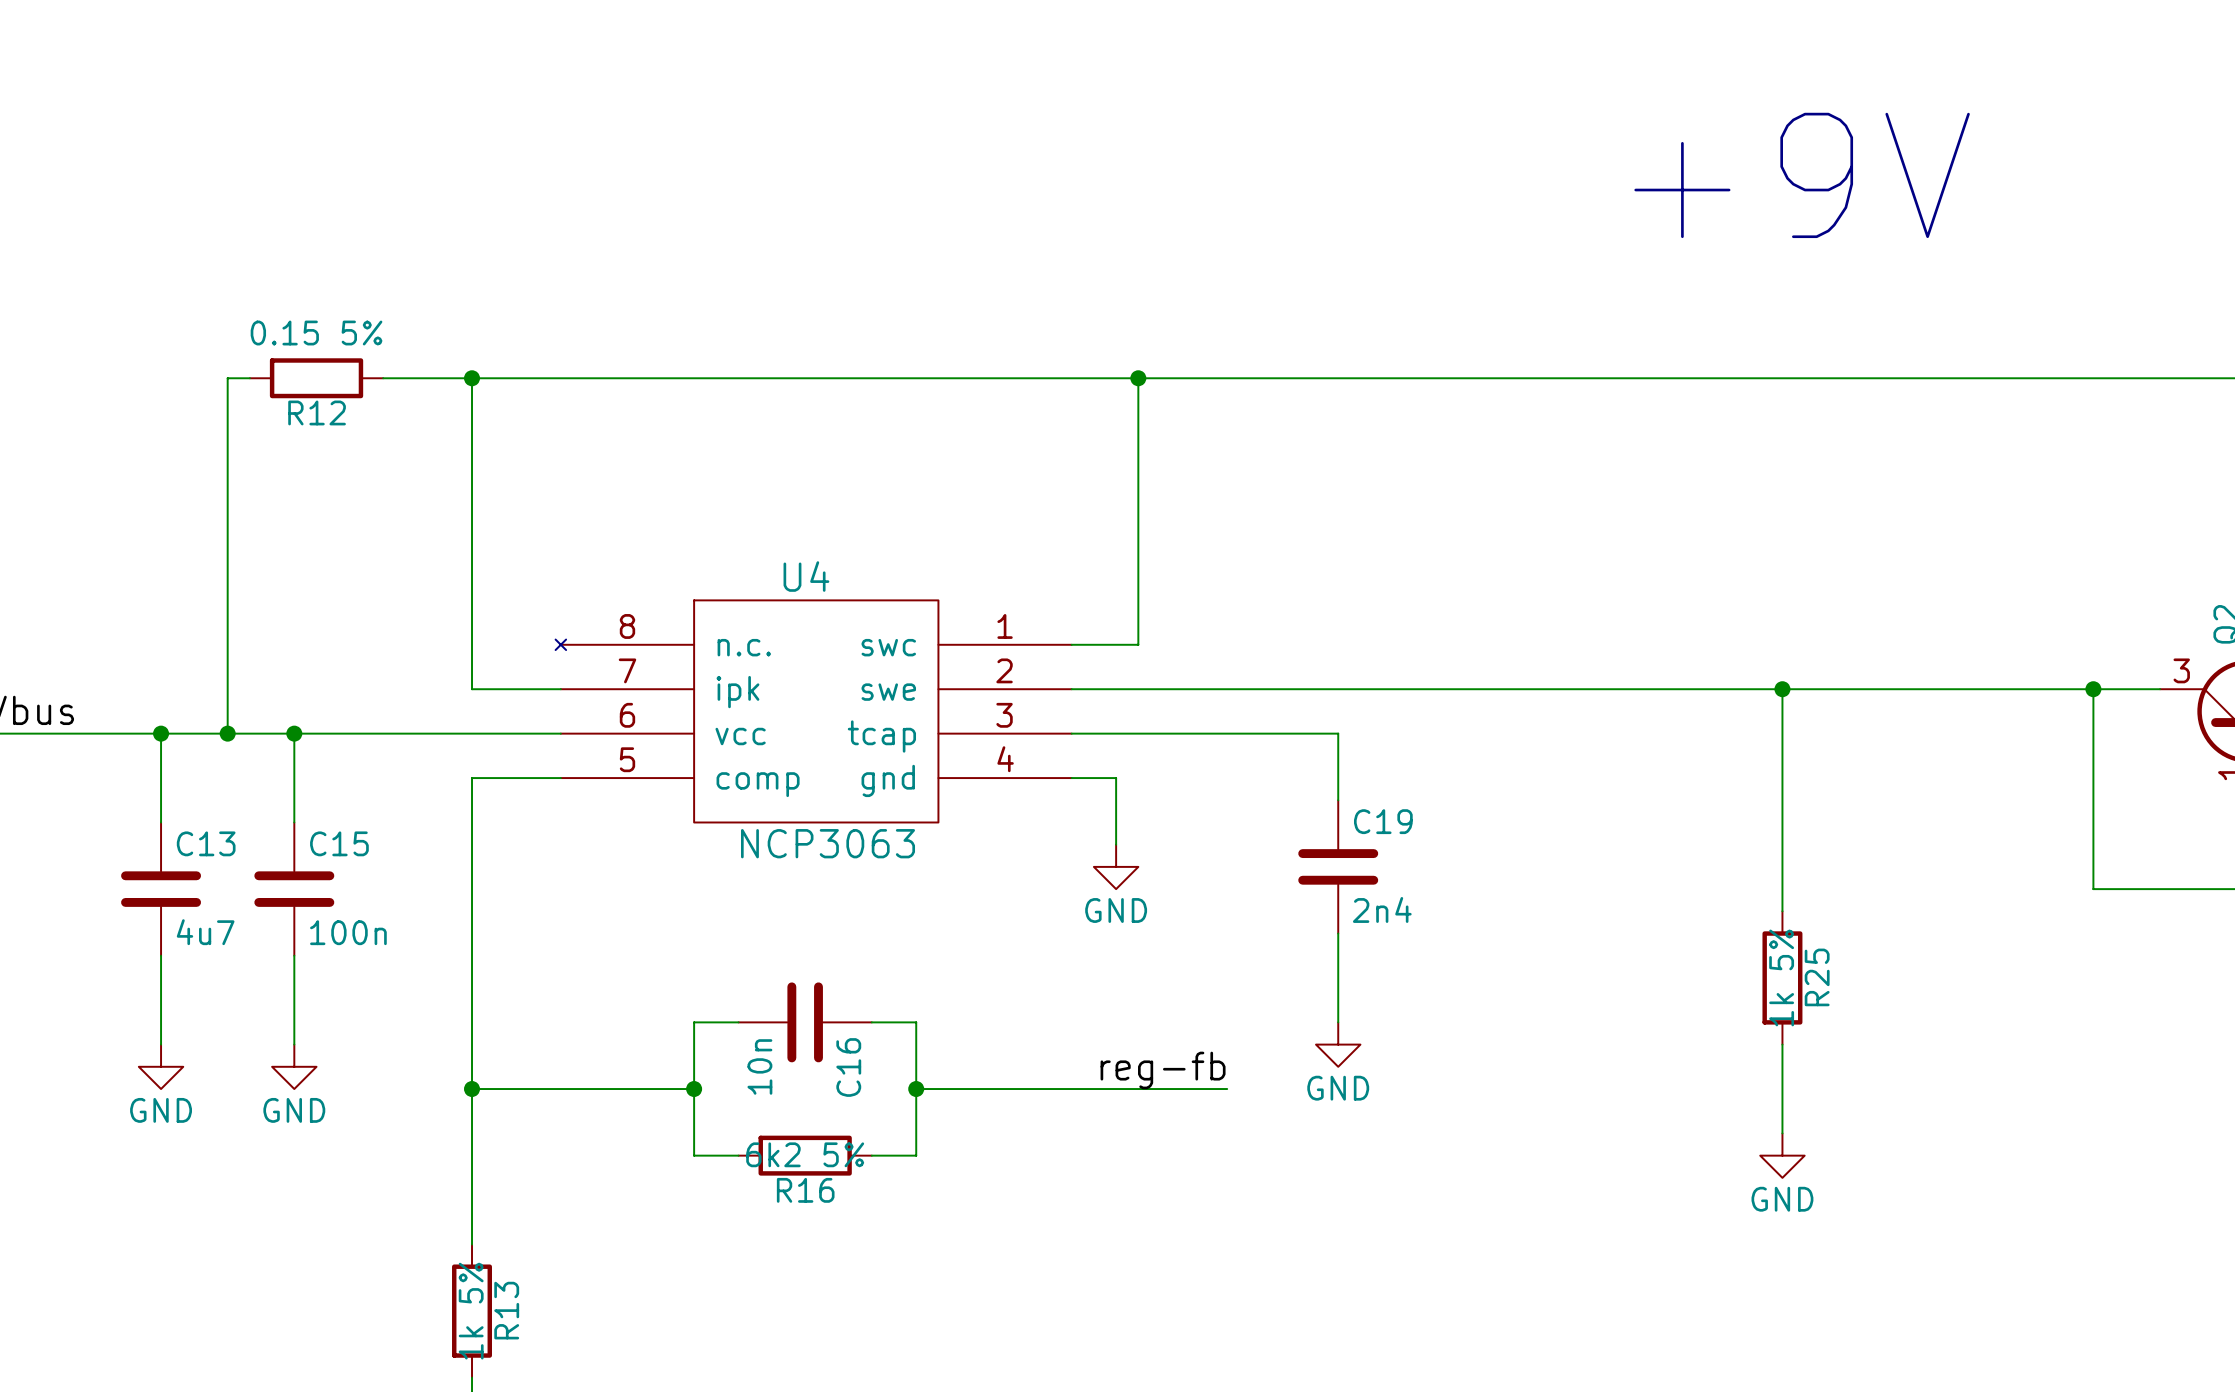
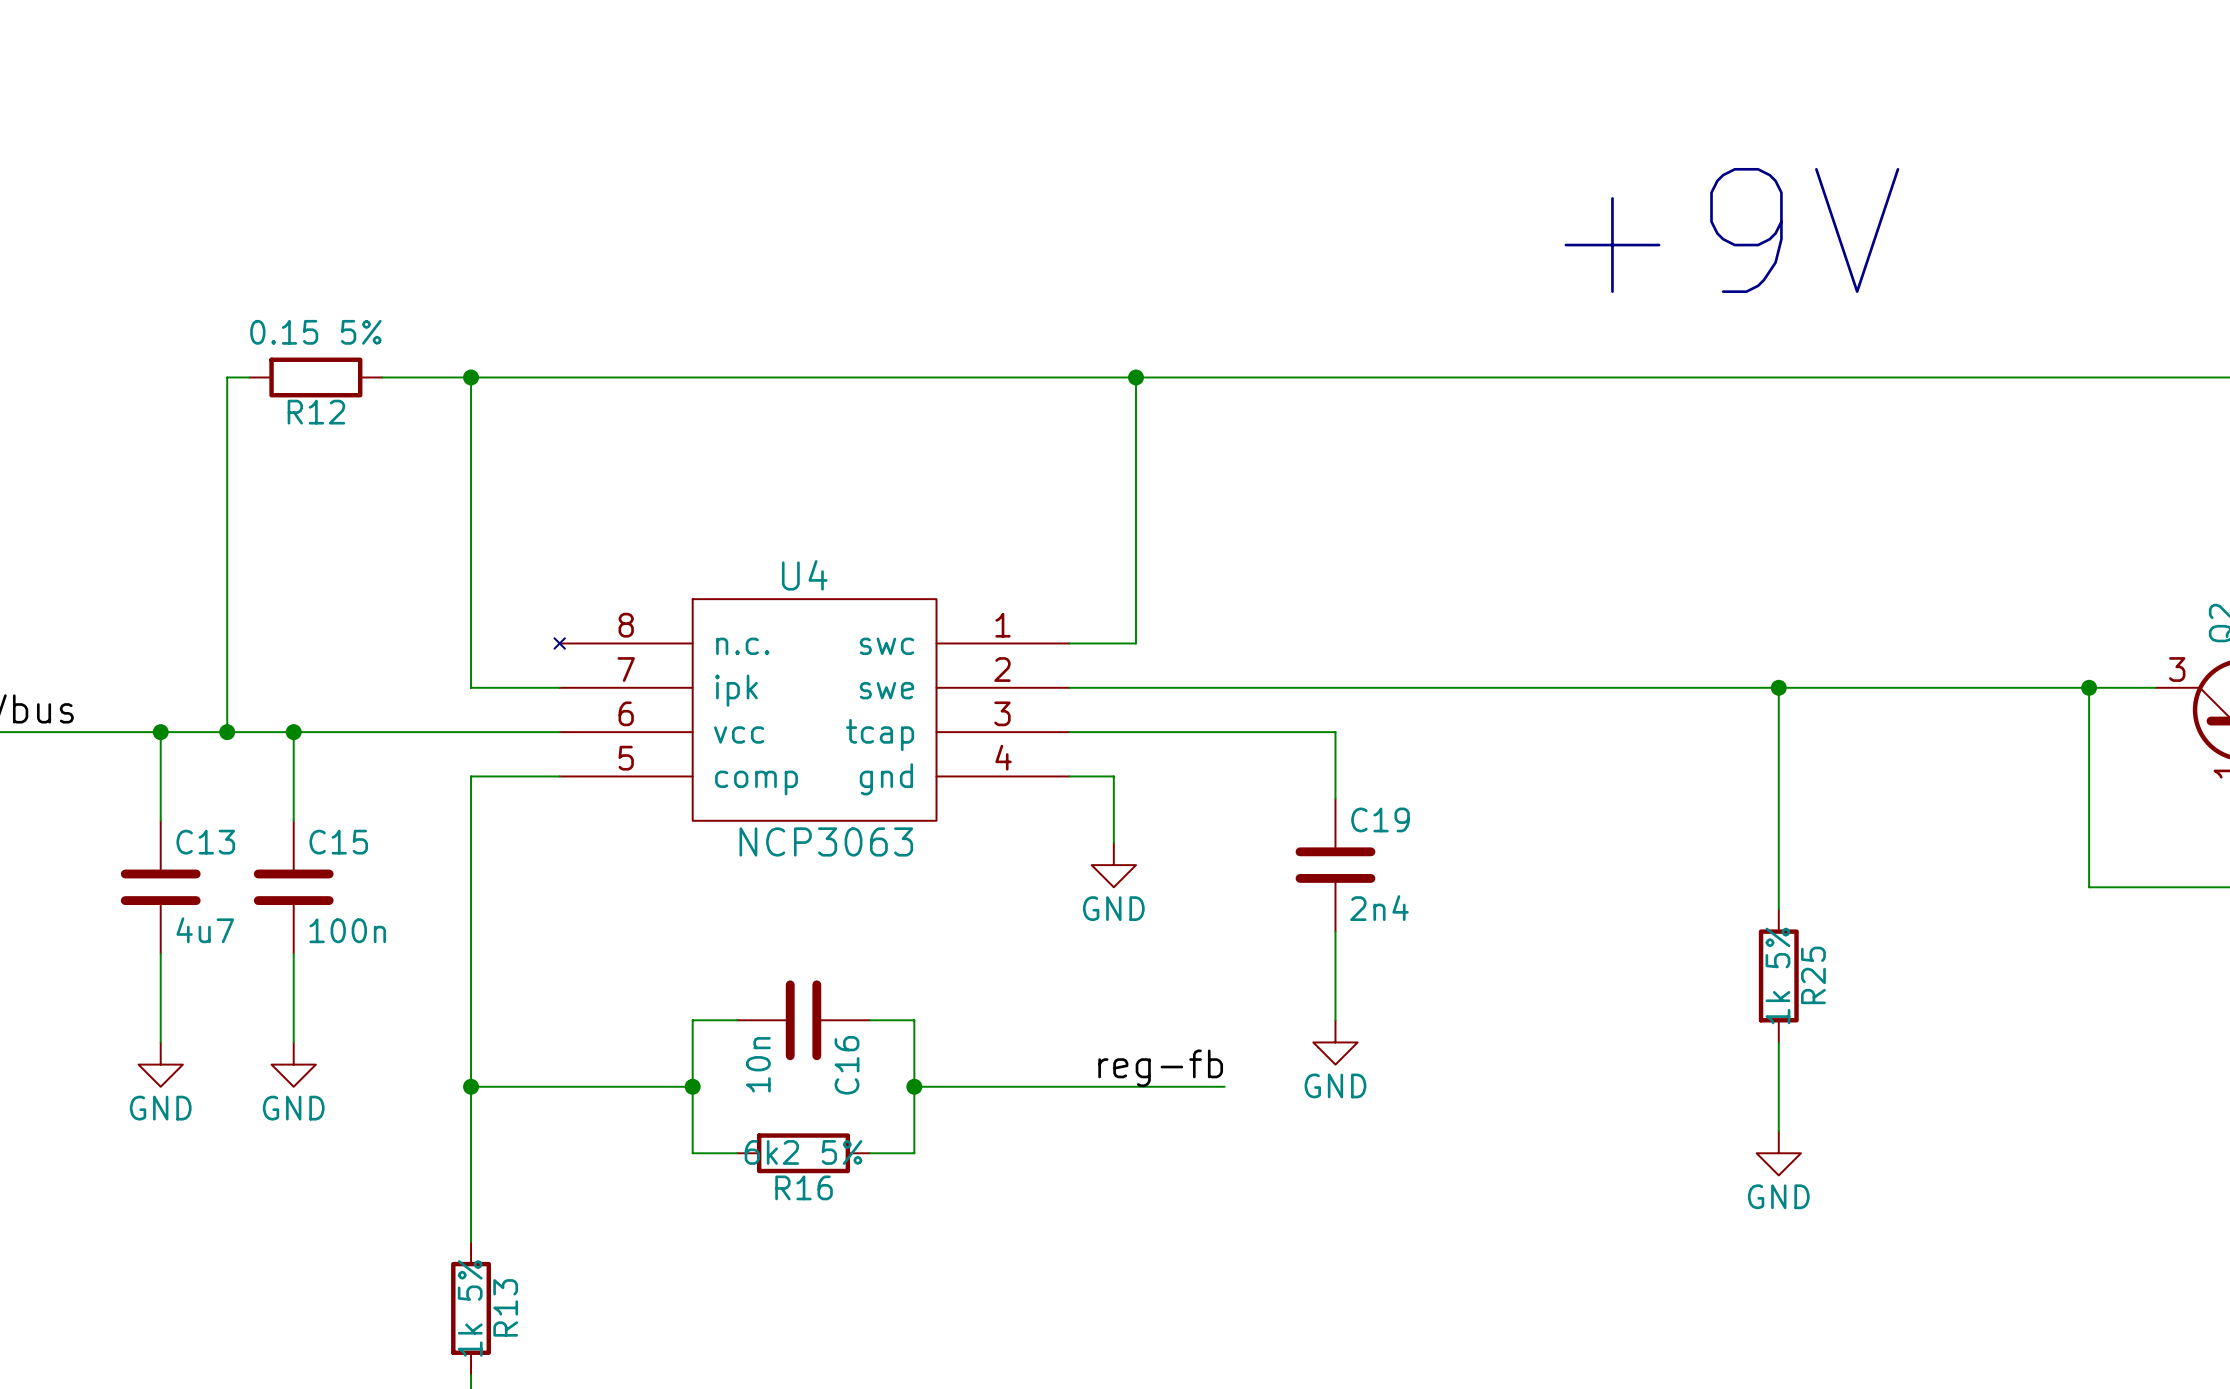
text position: +9V (1802, 175) -> +9V (1731, 230)

